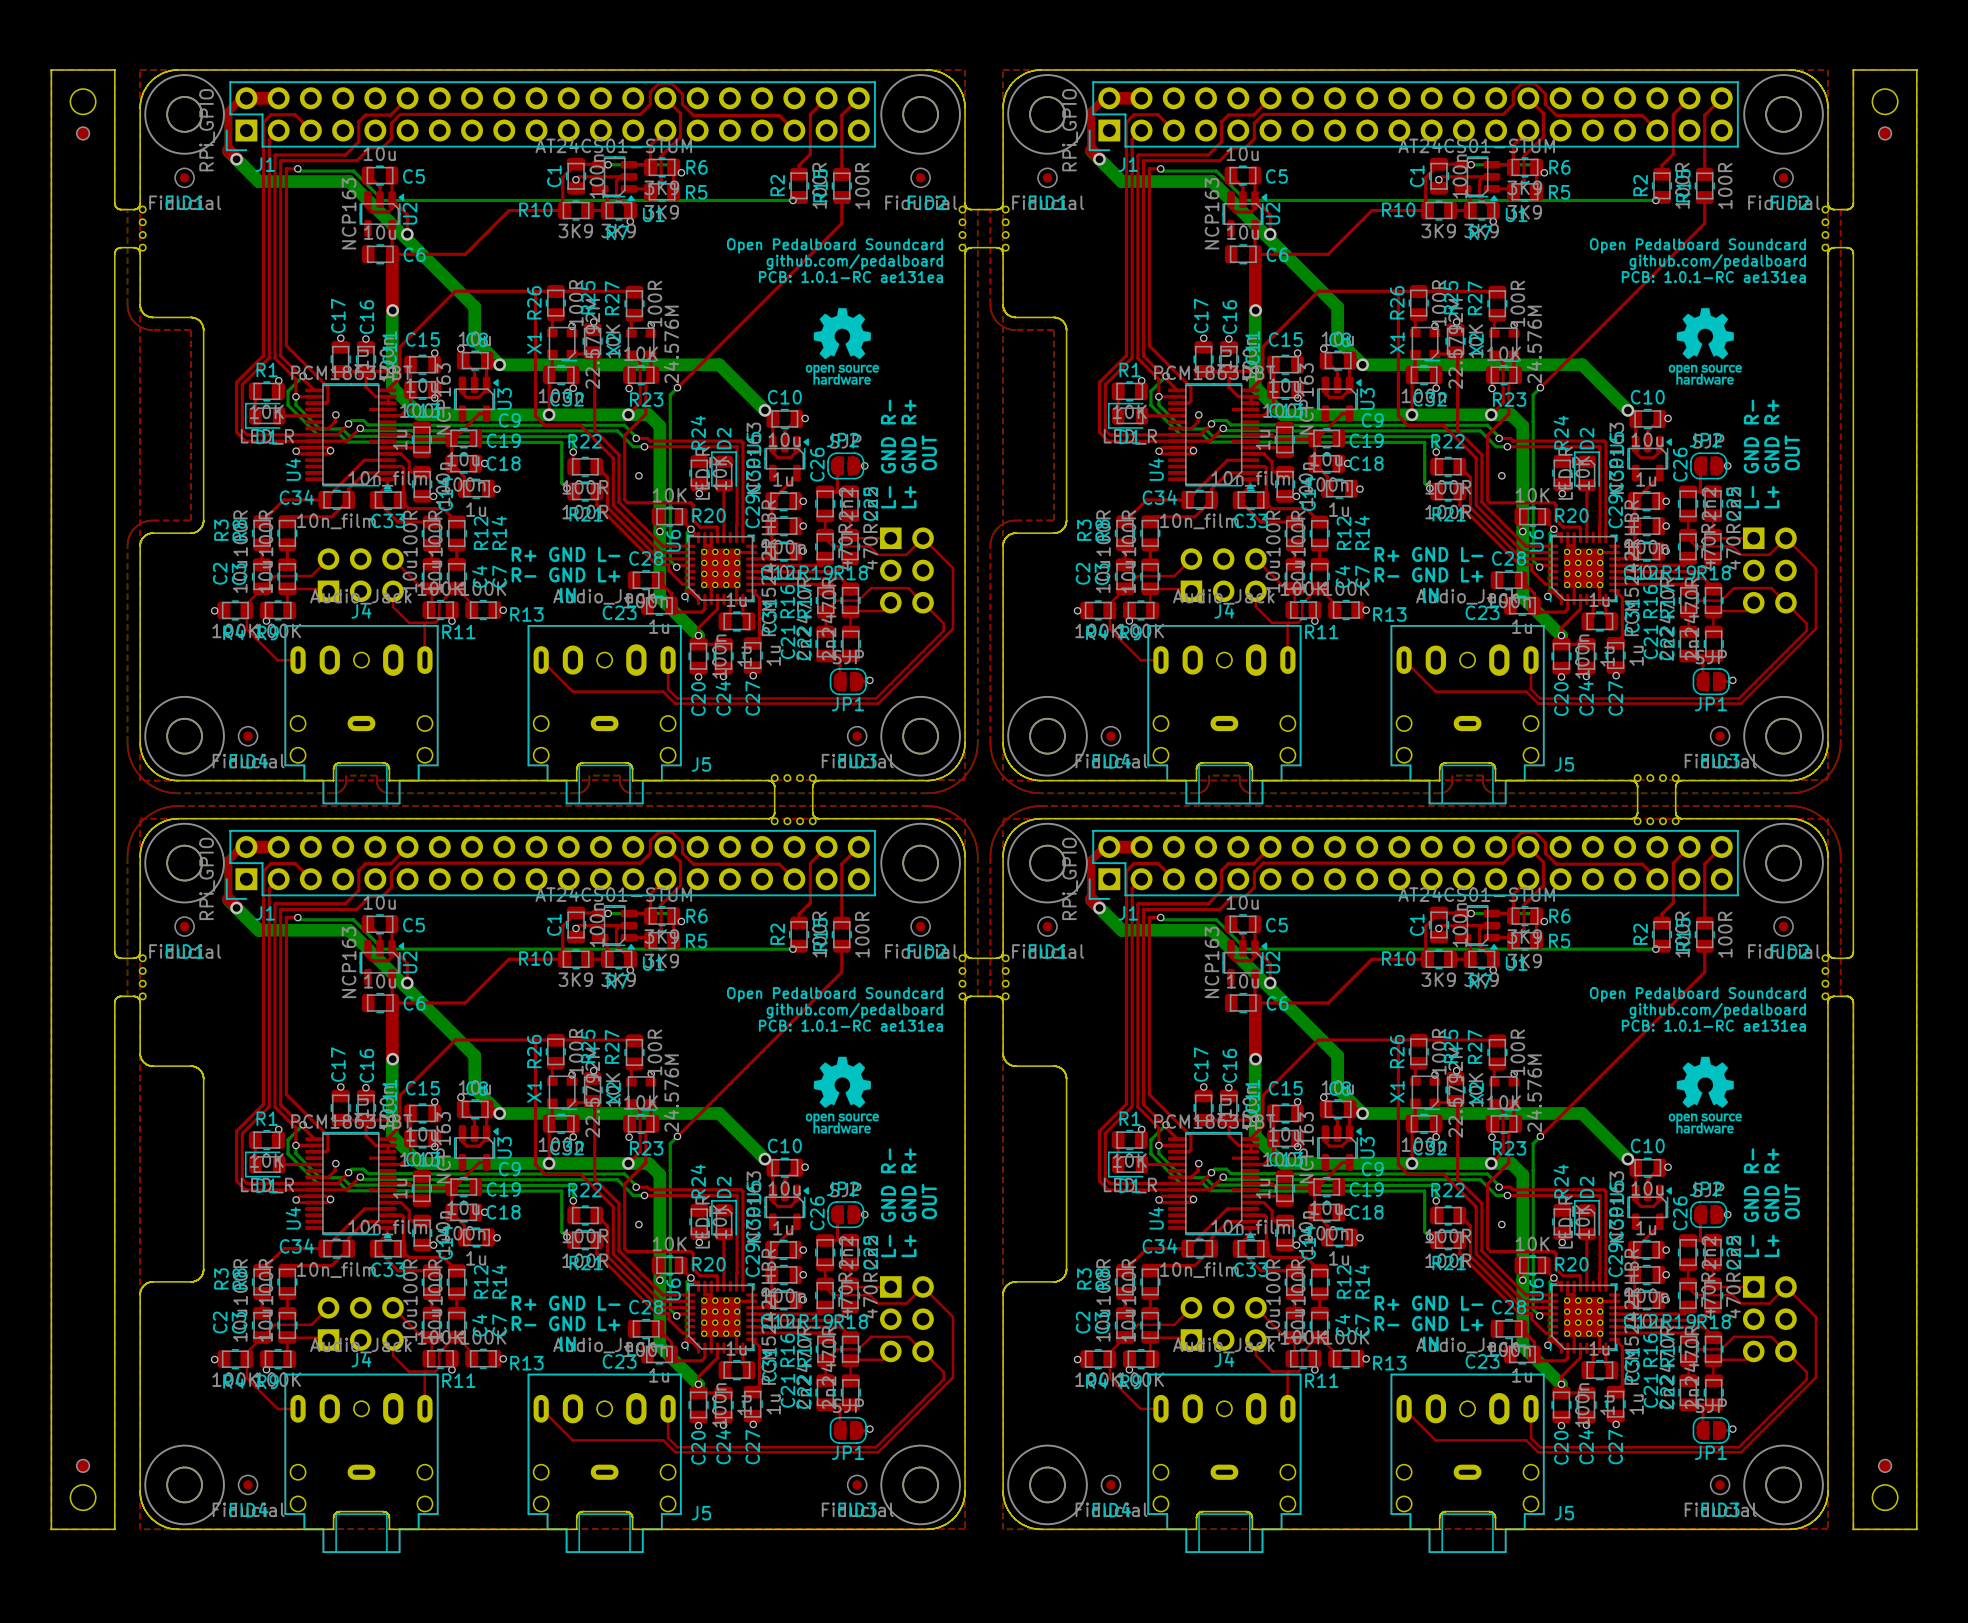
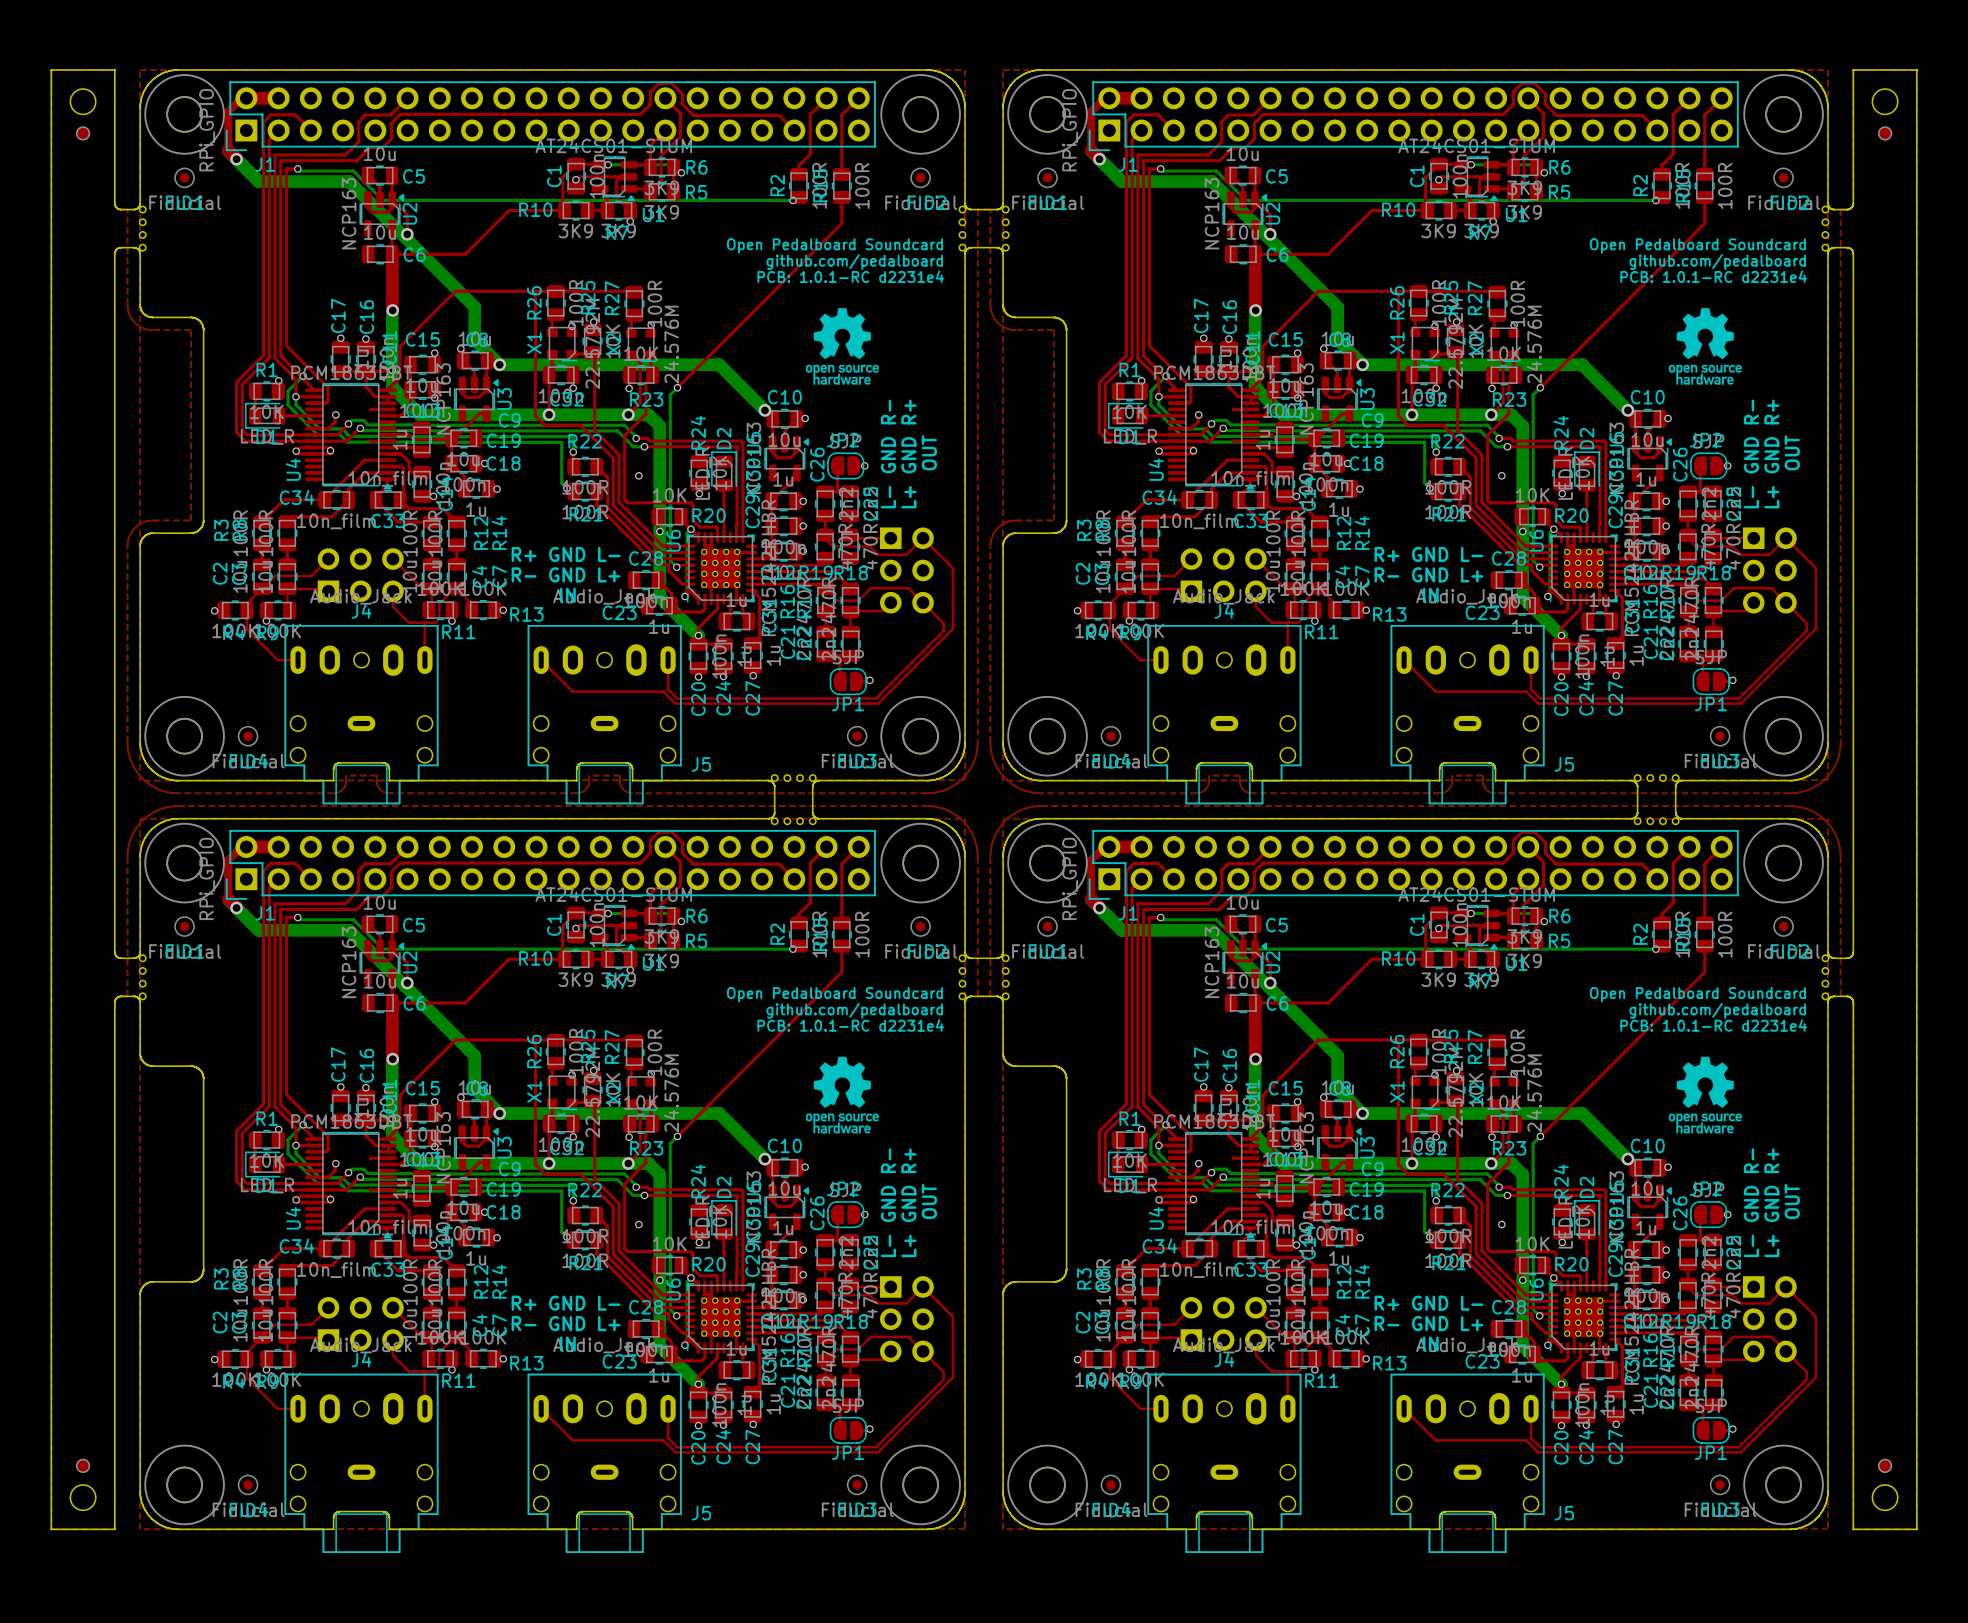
text: PCB: 1.0.1-RC ae131ea (850, 276) -> PCB: 1.0.1-RC d2231e4 (850, 276)
text: PCB: 1.0.1-RC ae131ea (1713, 276) -> PCB: 1.0.1-RC d2231e4 (1713, 276)
text: PCB: 1.0.1-RC ae131ea (850, 1025) -> PCB: 1.0.1-RC d2231e4 (850, 1025)
text: PCB: 1.0.1-RC ae131ea (1713, 1025) -> PCB: 1.0.1-RC d2231e4 (1713, 1025)

